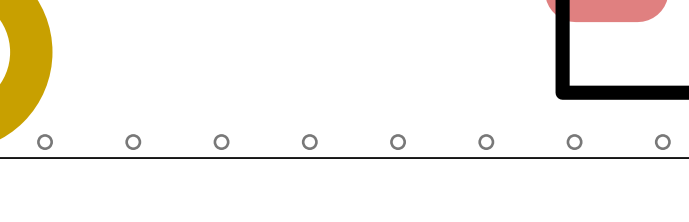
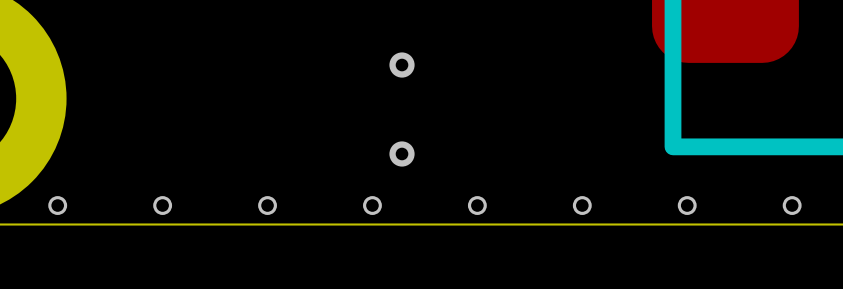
via: none -> (402, 65)
via: none -> (402, 153)

